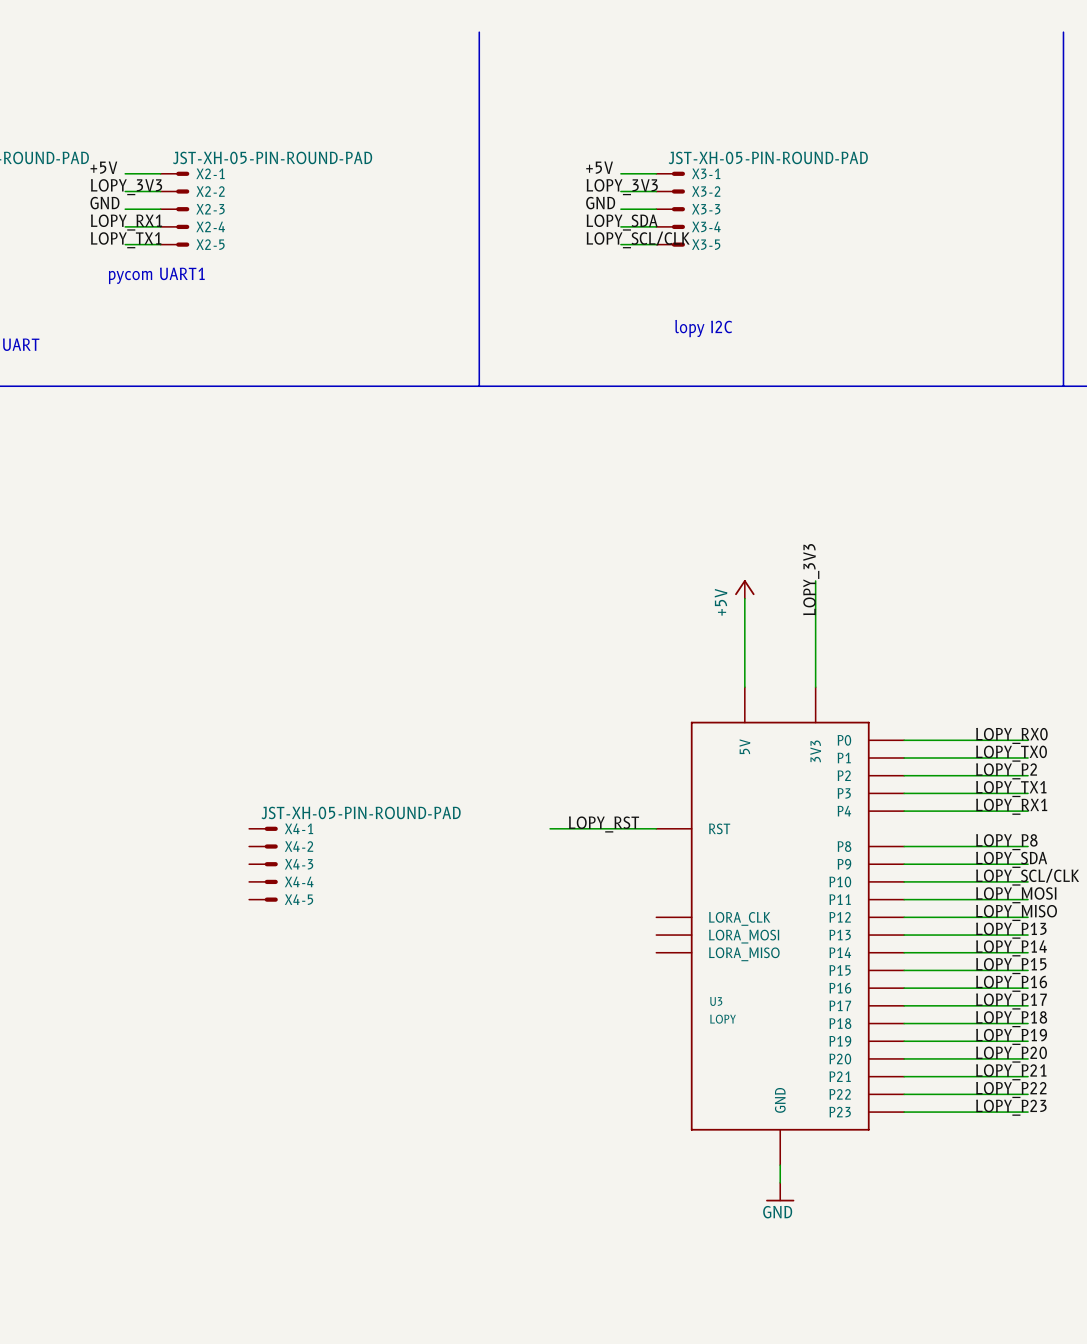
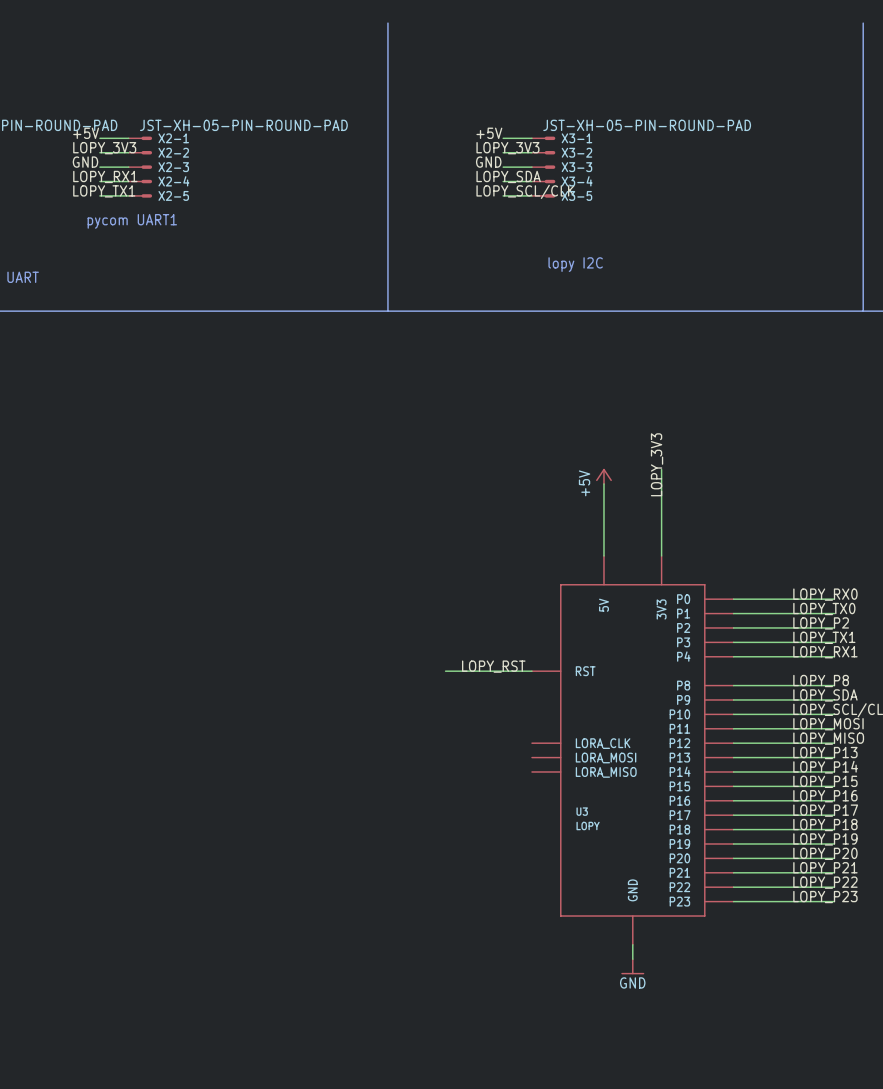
X4-1: JST-XH-05-PIN-ROUND-PAD (263, 828) -> none
X4-2: (263, 846) -> none
X4-3: (263, 864) -> none
X4-4: (263, 881) -> none
X4-5: (263, 899) -> none

